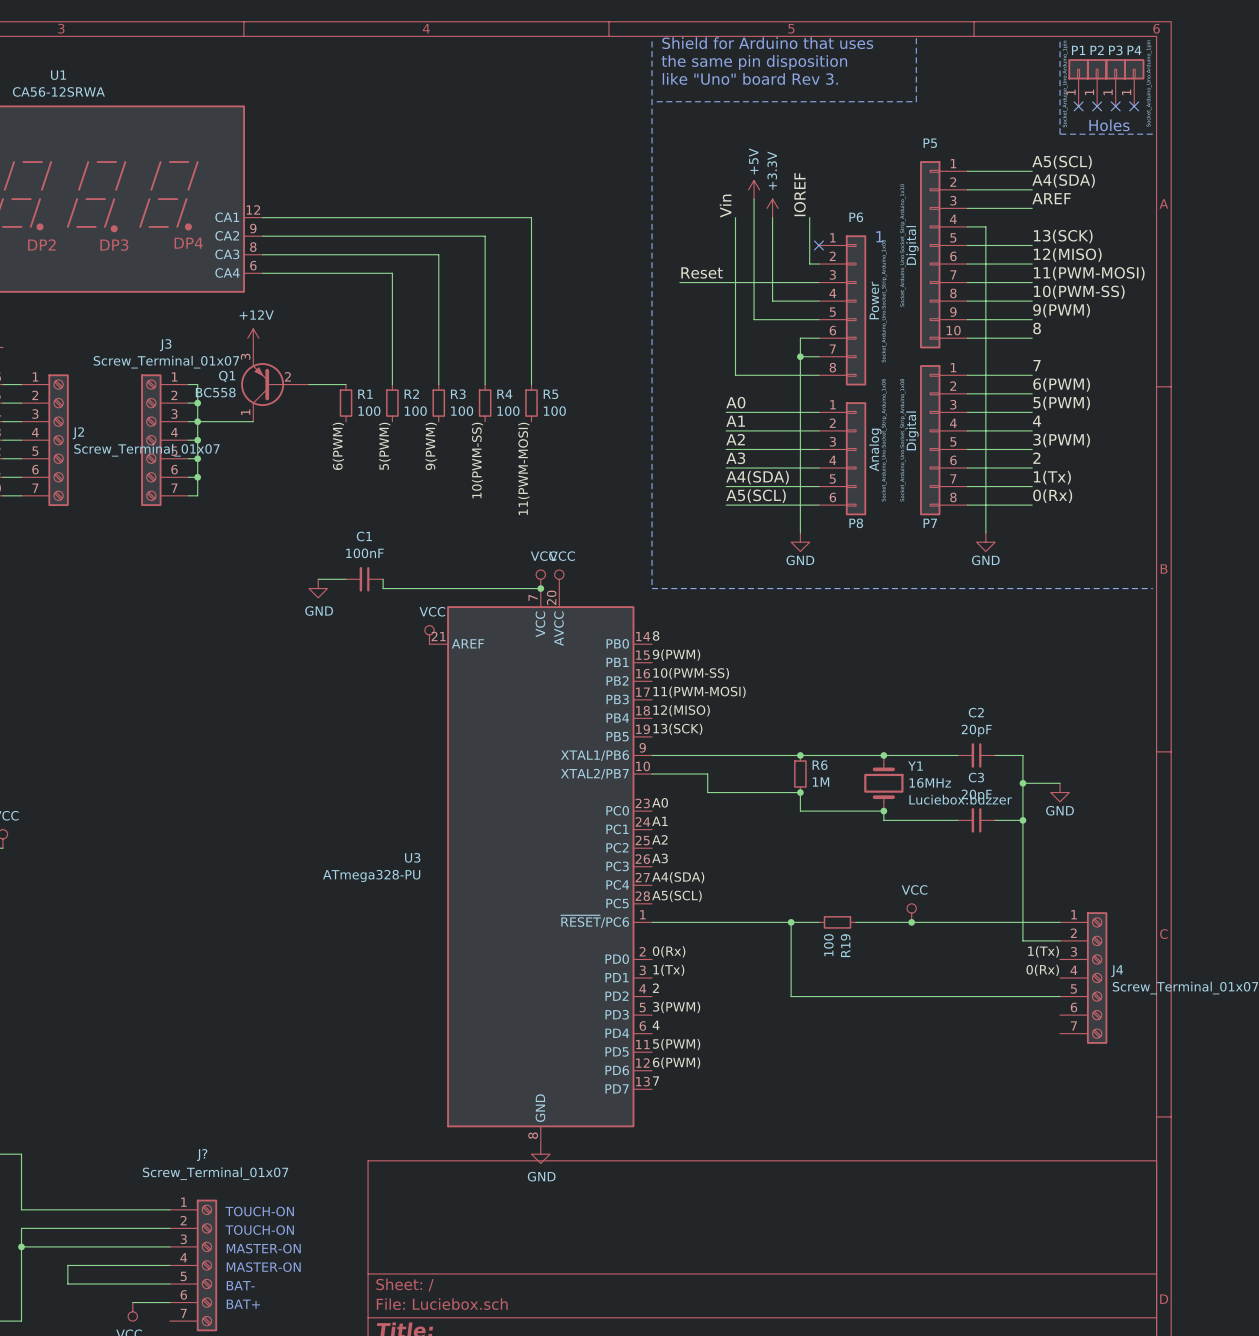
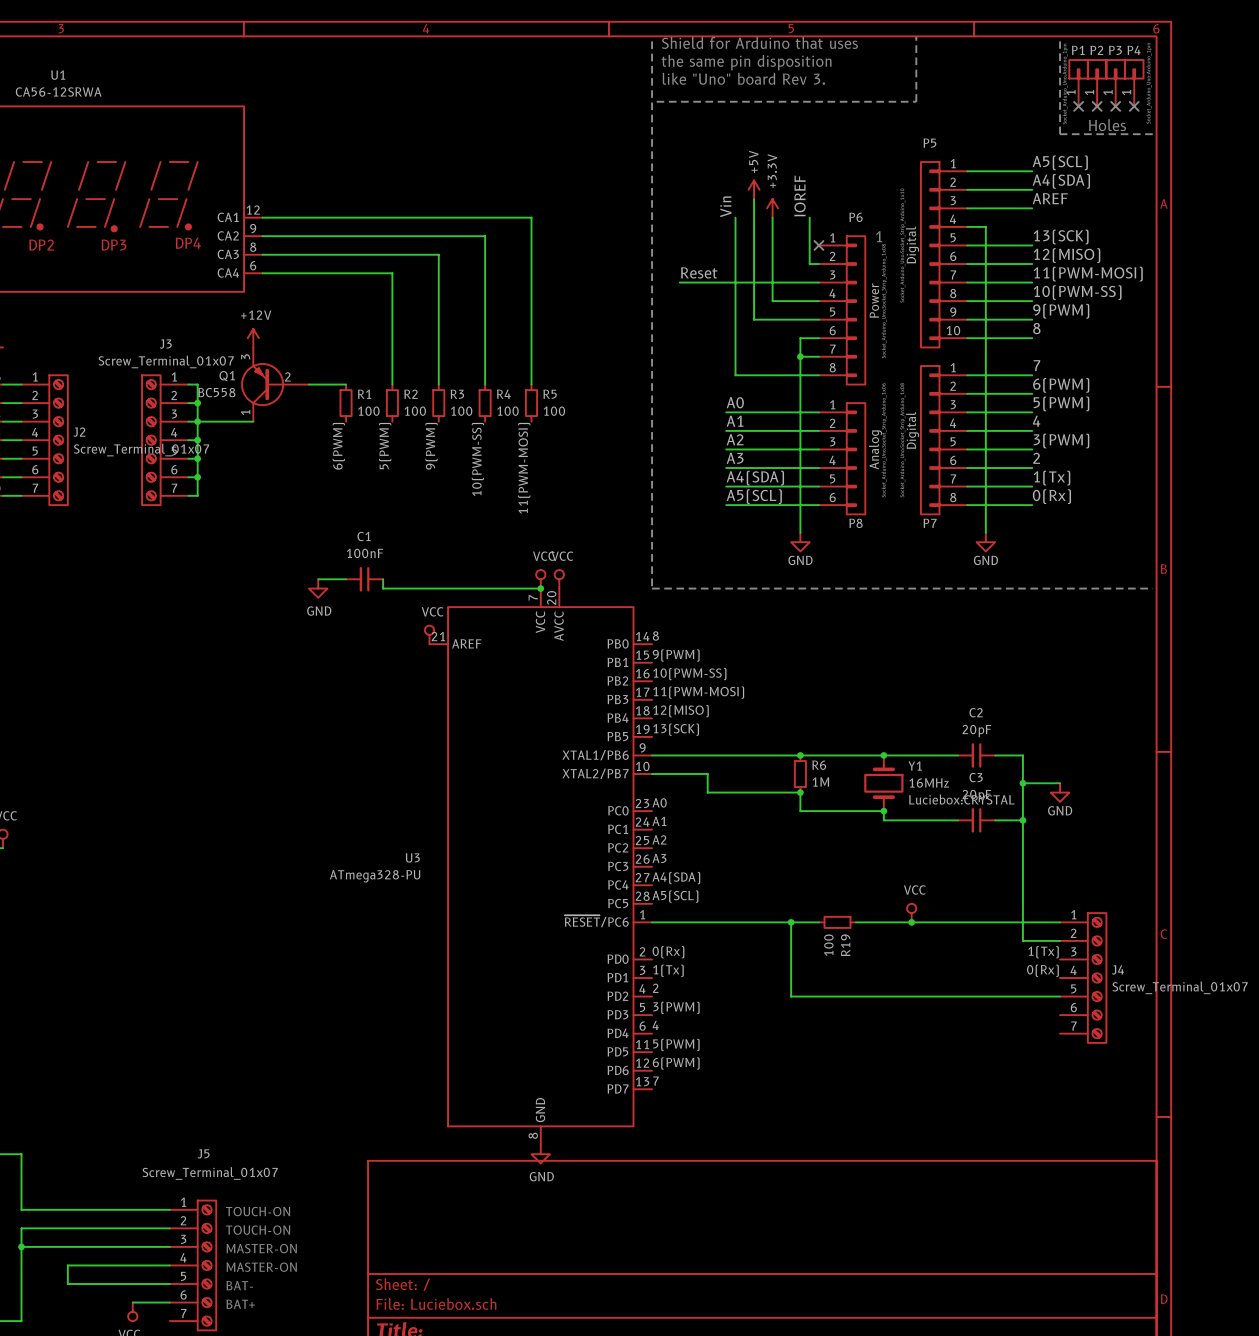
Y1 text: Luciebox:buzzer (960, 799) -> Luciebox:CRYSTAL (961, 799)
J? name: J? (202, 1155) -> J5 (203, 1153)

